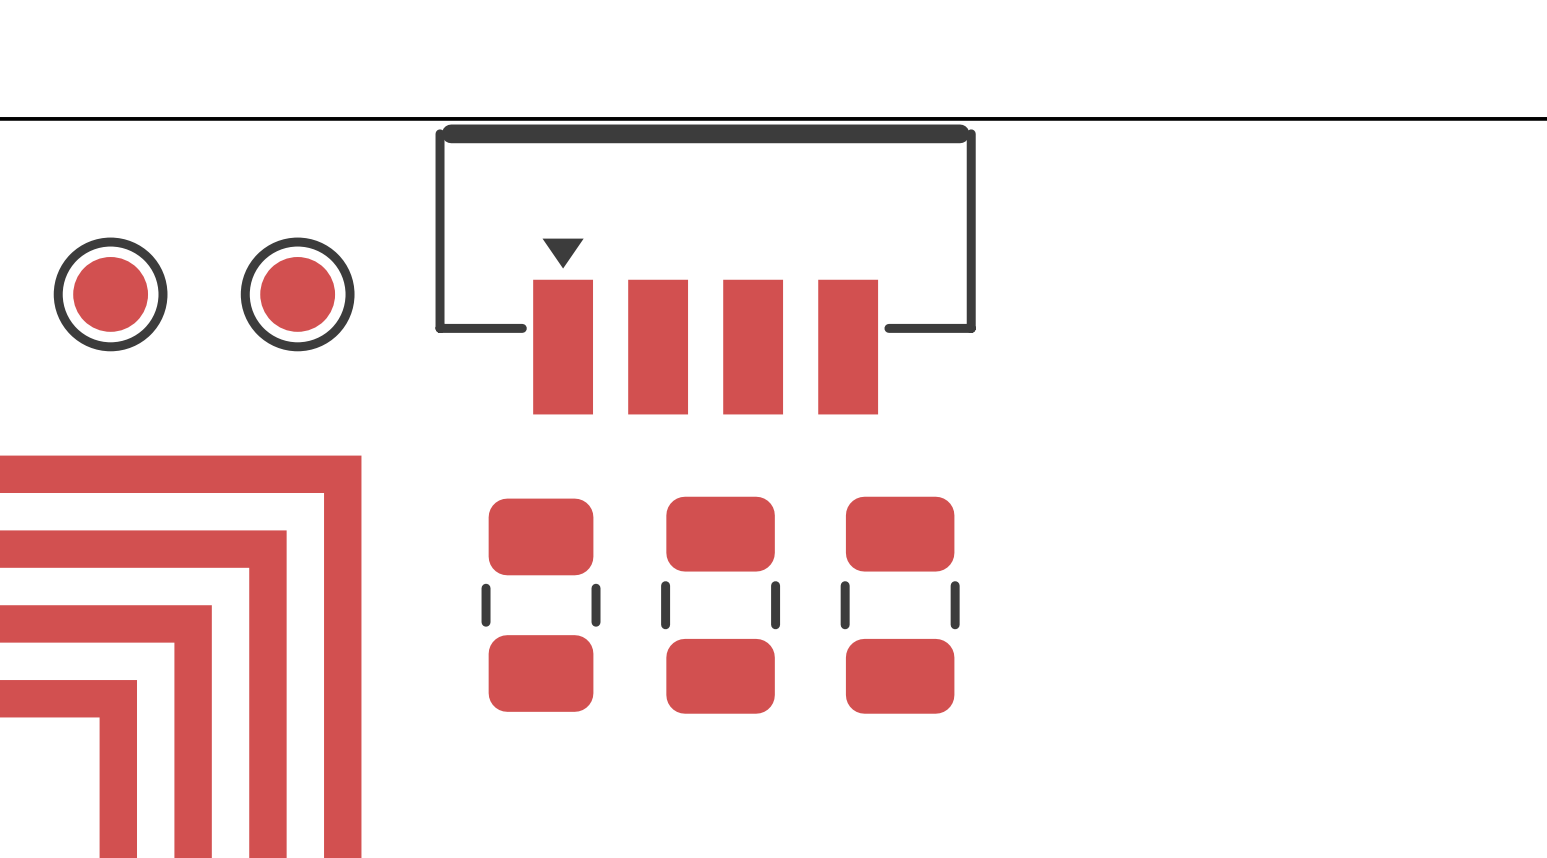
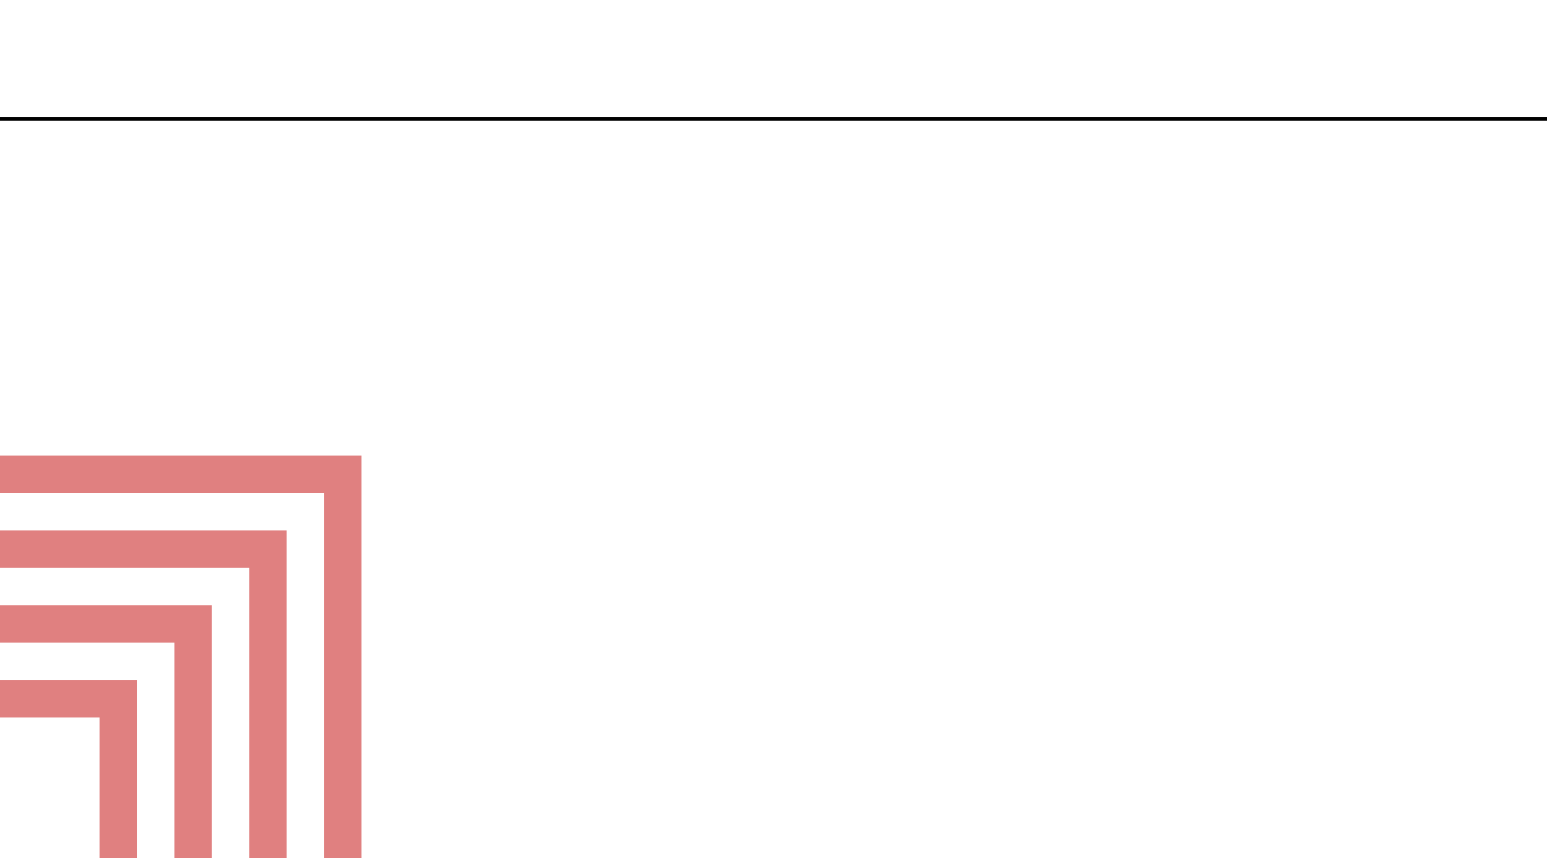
part: (705, 269) -> none
part: (110, 294) -> none
part: (297, 294) -> none
part: (541, 605) -> none
part: (720, 605) -> none
part: (900, 605) -> none

